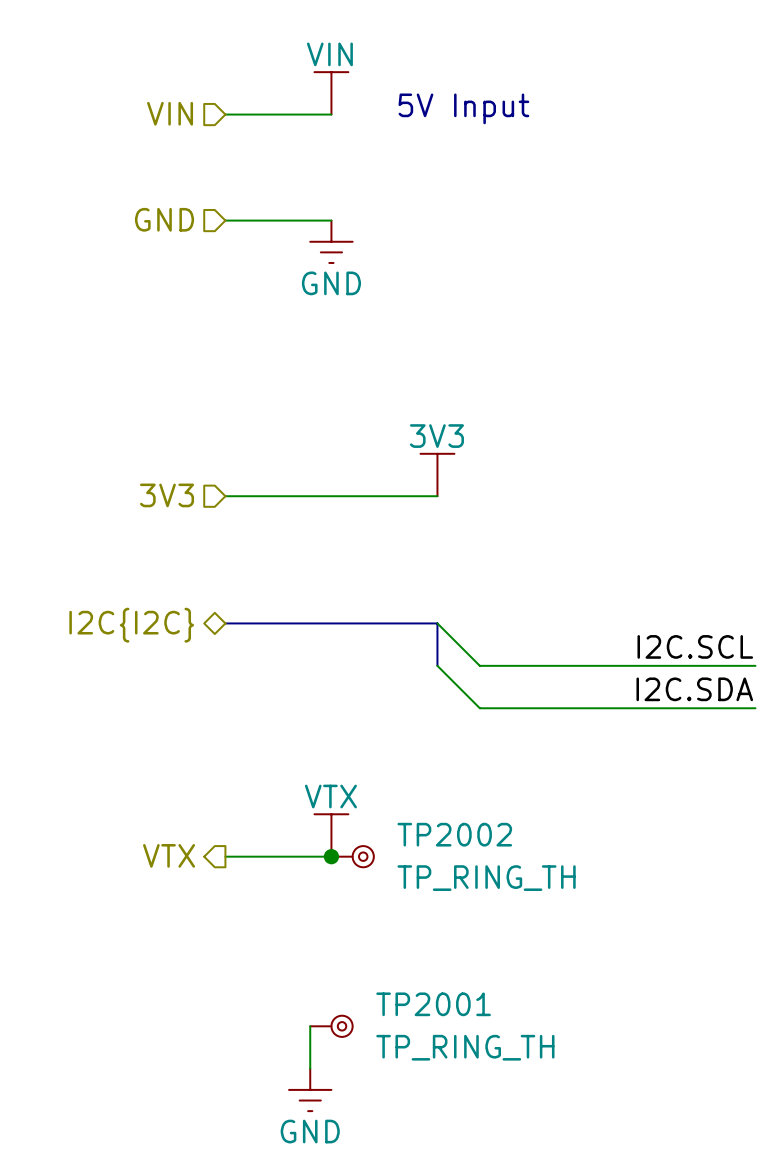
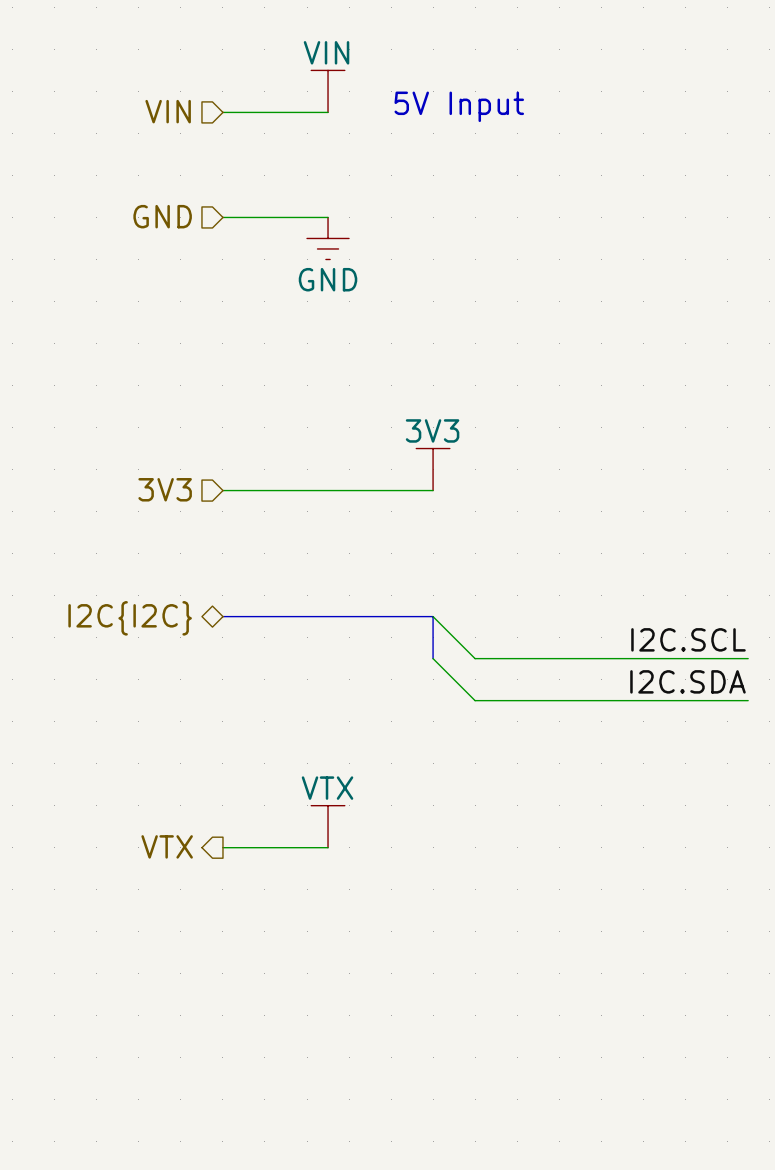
junction: (331, 856) -> none
TP2002: TP_RING_TH (352, 856) -> none
wire: (310, 1026) (310, 1068) -> none
TP2001: TP_RING_TH (331, 1026) -> none
power symbol: GND (310, 1089) -> none

